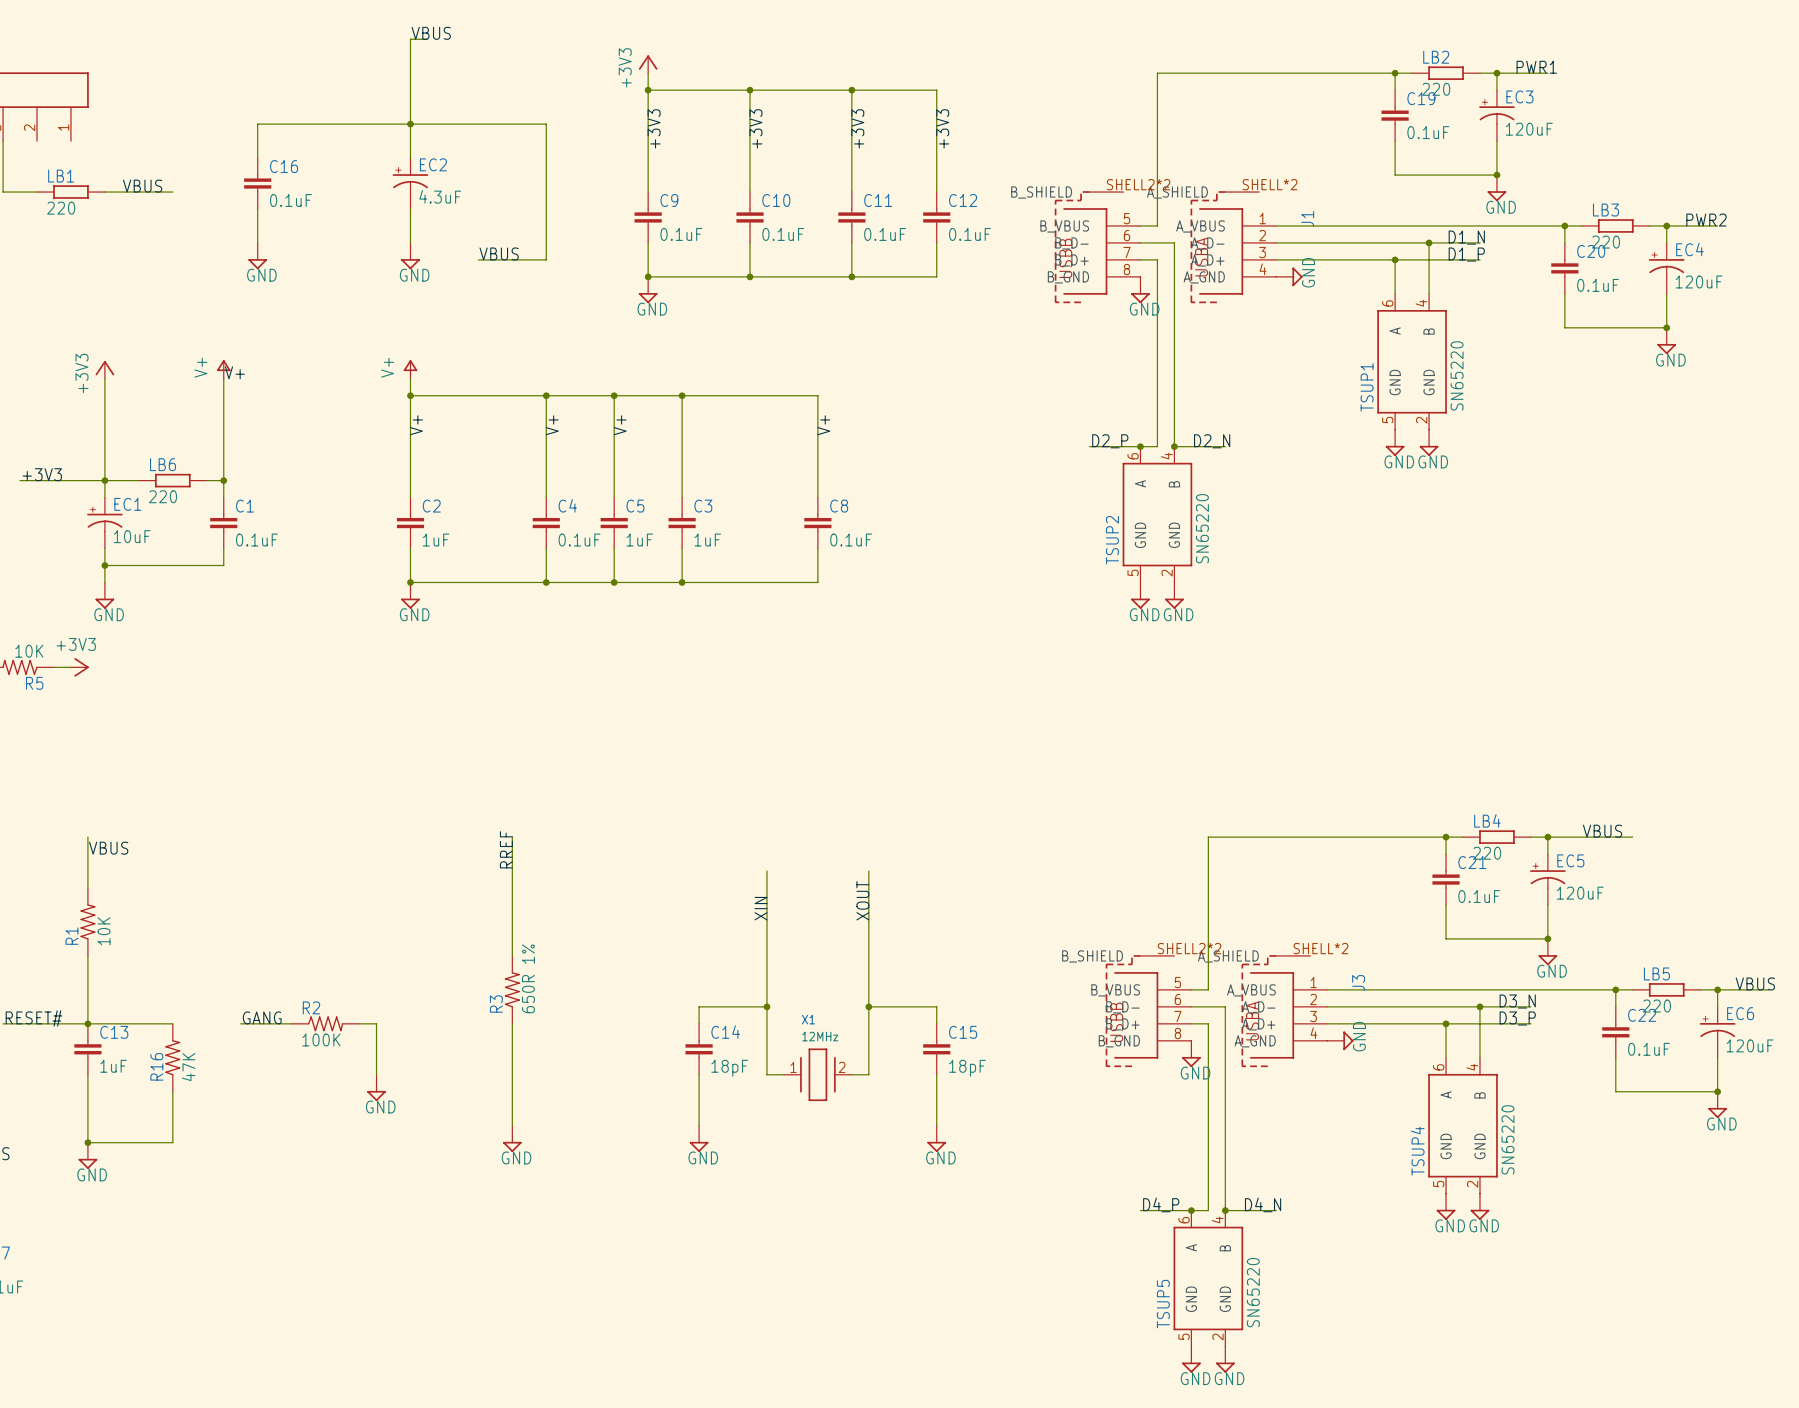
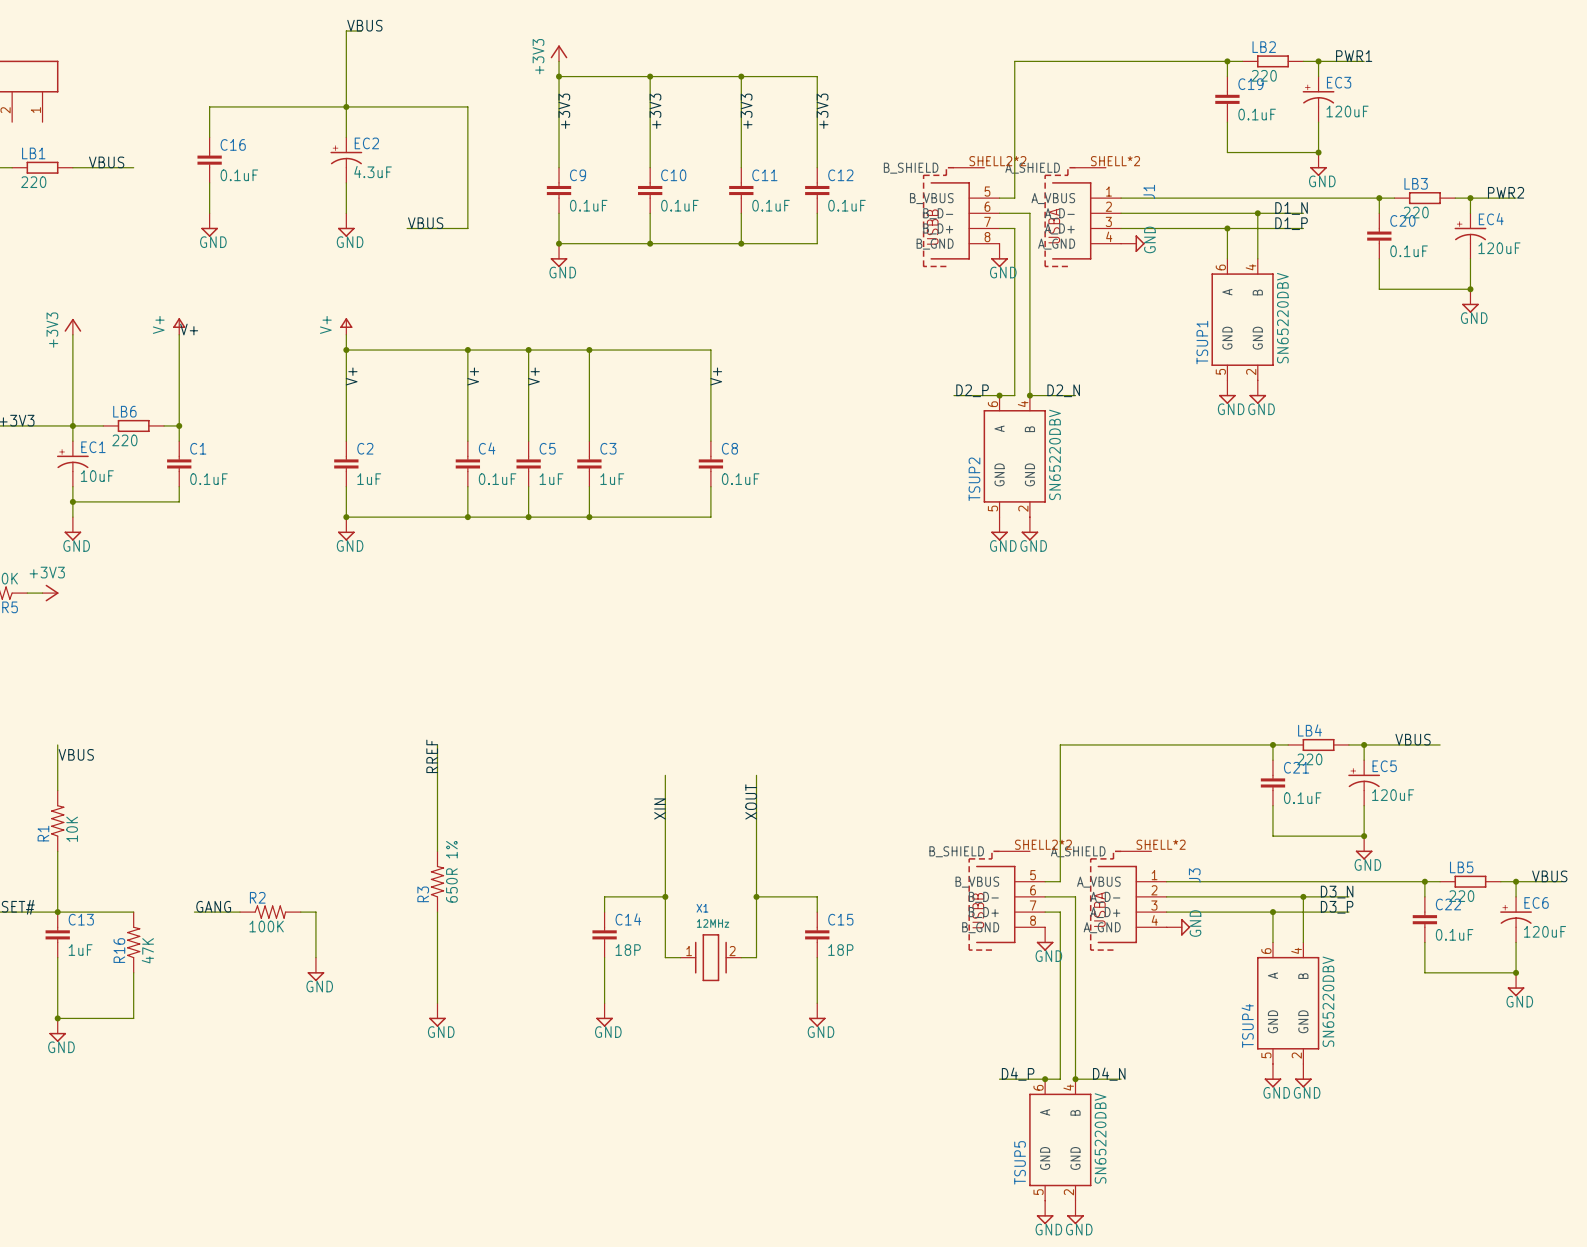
TSUP1 value: SN65220 (1457, 375) -> SN65220DBV (1282, 318)
TSUP2 value: SN65220 (1202, 528) -> SN65220DBV (1054, 454)
C14 value: 18pF (729, 1068) -> 18P (628, 950)
C15 value: 18pF (967, 1068) -> 18P (840, 950)
TSUP4 value: SN65220 (1507, 1139) -> SN65220DBV (1328, 1001)
TSUP5 value: SN65220 (1253, 1292) -> SN65220DBV (1100, 1138)

